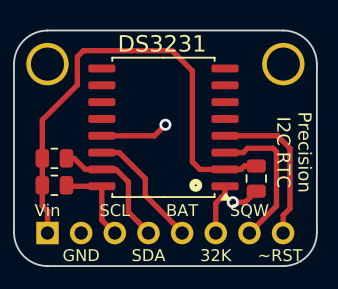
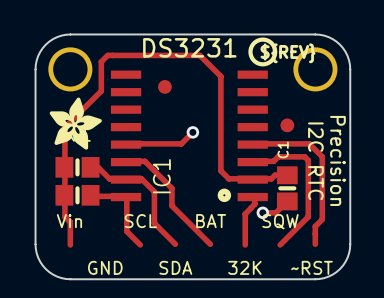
drawing: none -> [248, 37, 278, 67]
part: none -> (164, 86)
drawing: none -> [49, 97, 102, 150]
part: none -> (287, 125)
IC1: none -> (189, 135)
part: (163, 128) -> none
part: (54, 158) -> none
part: none -> (77, 167)
part footprint: [35, 174, 74, 196] -> [55, 185, 100, 206]
part: (256, 178) -> none
C1: none -> (287, 188)
part: (165, 233) -> none

